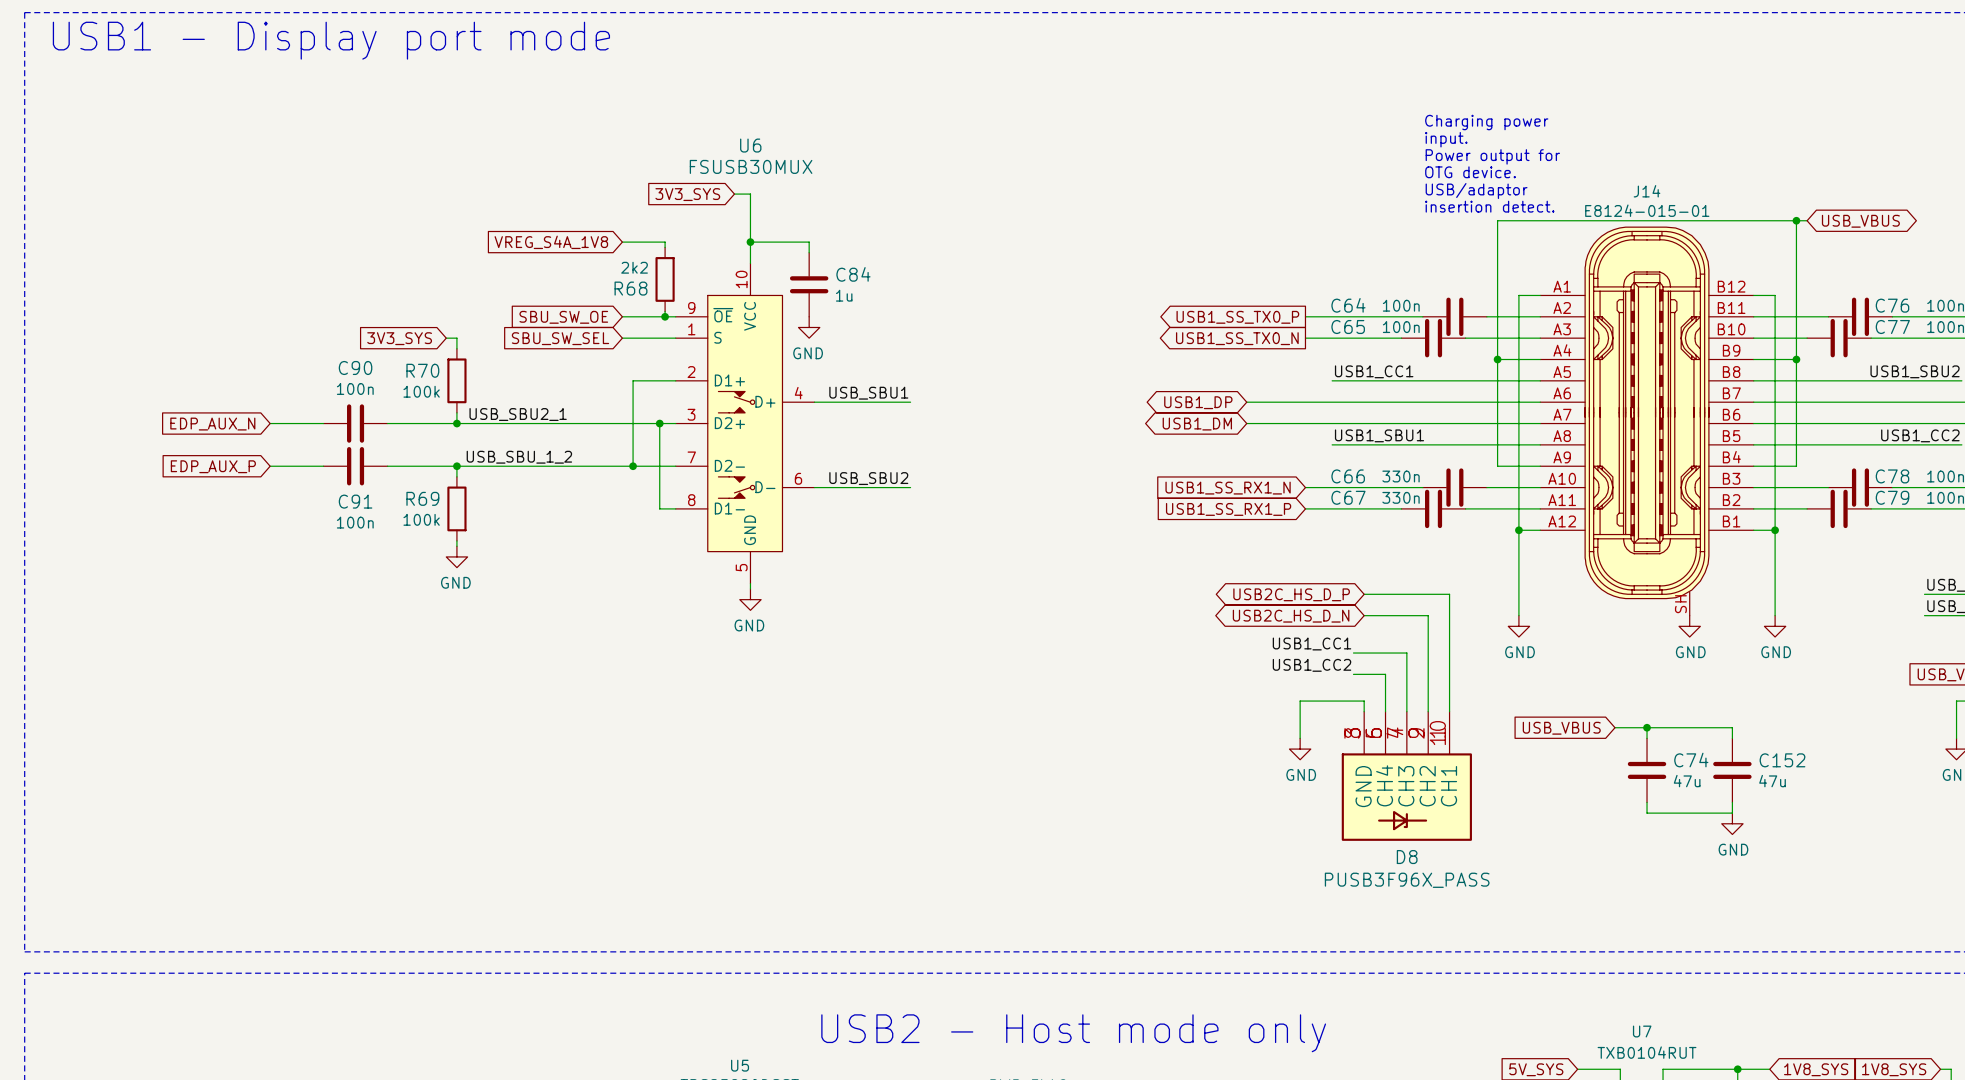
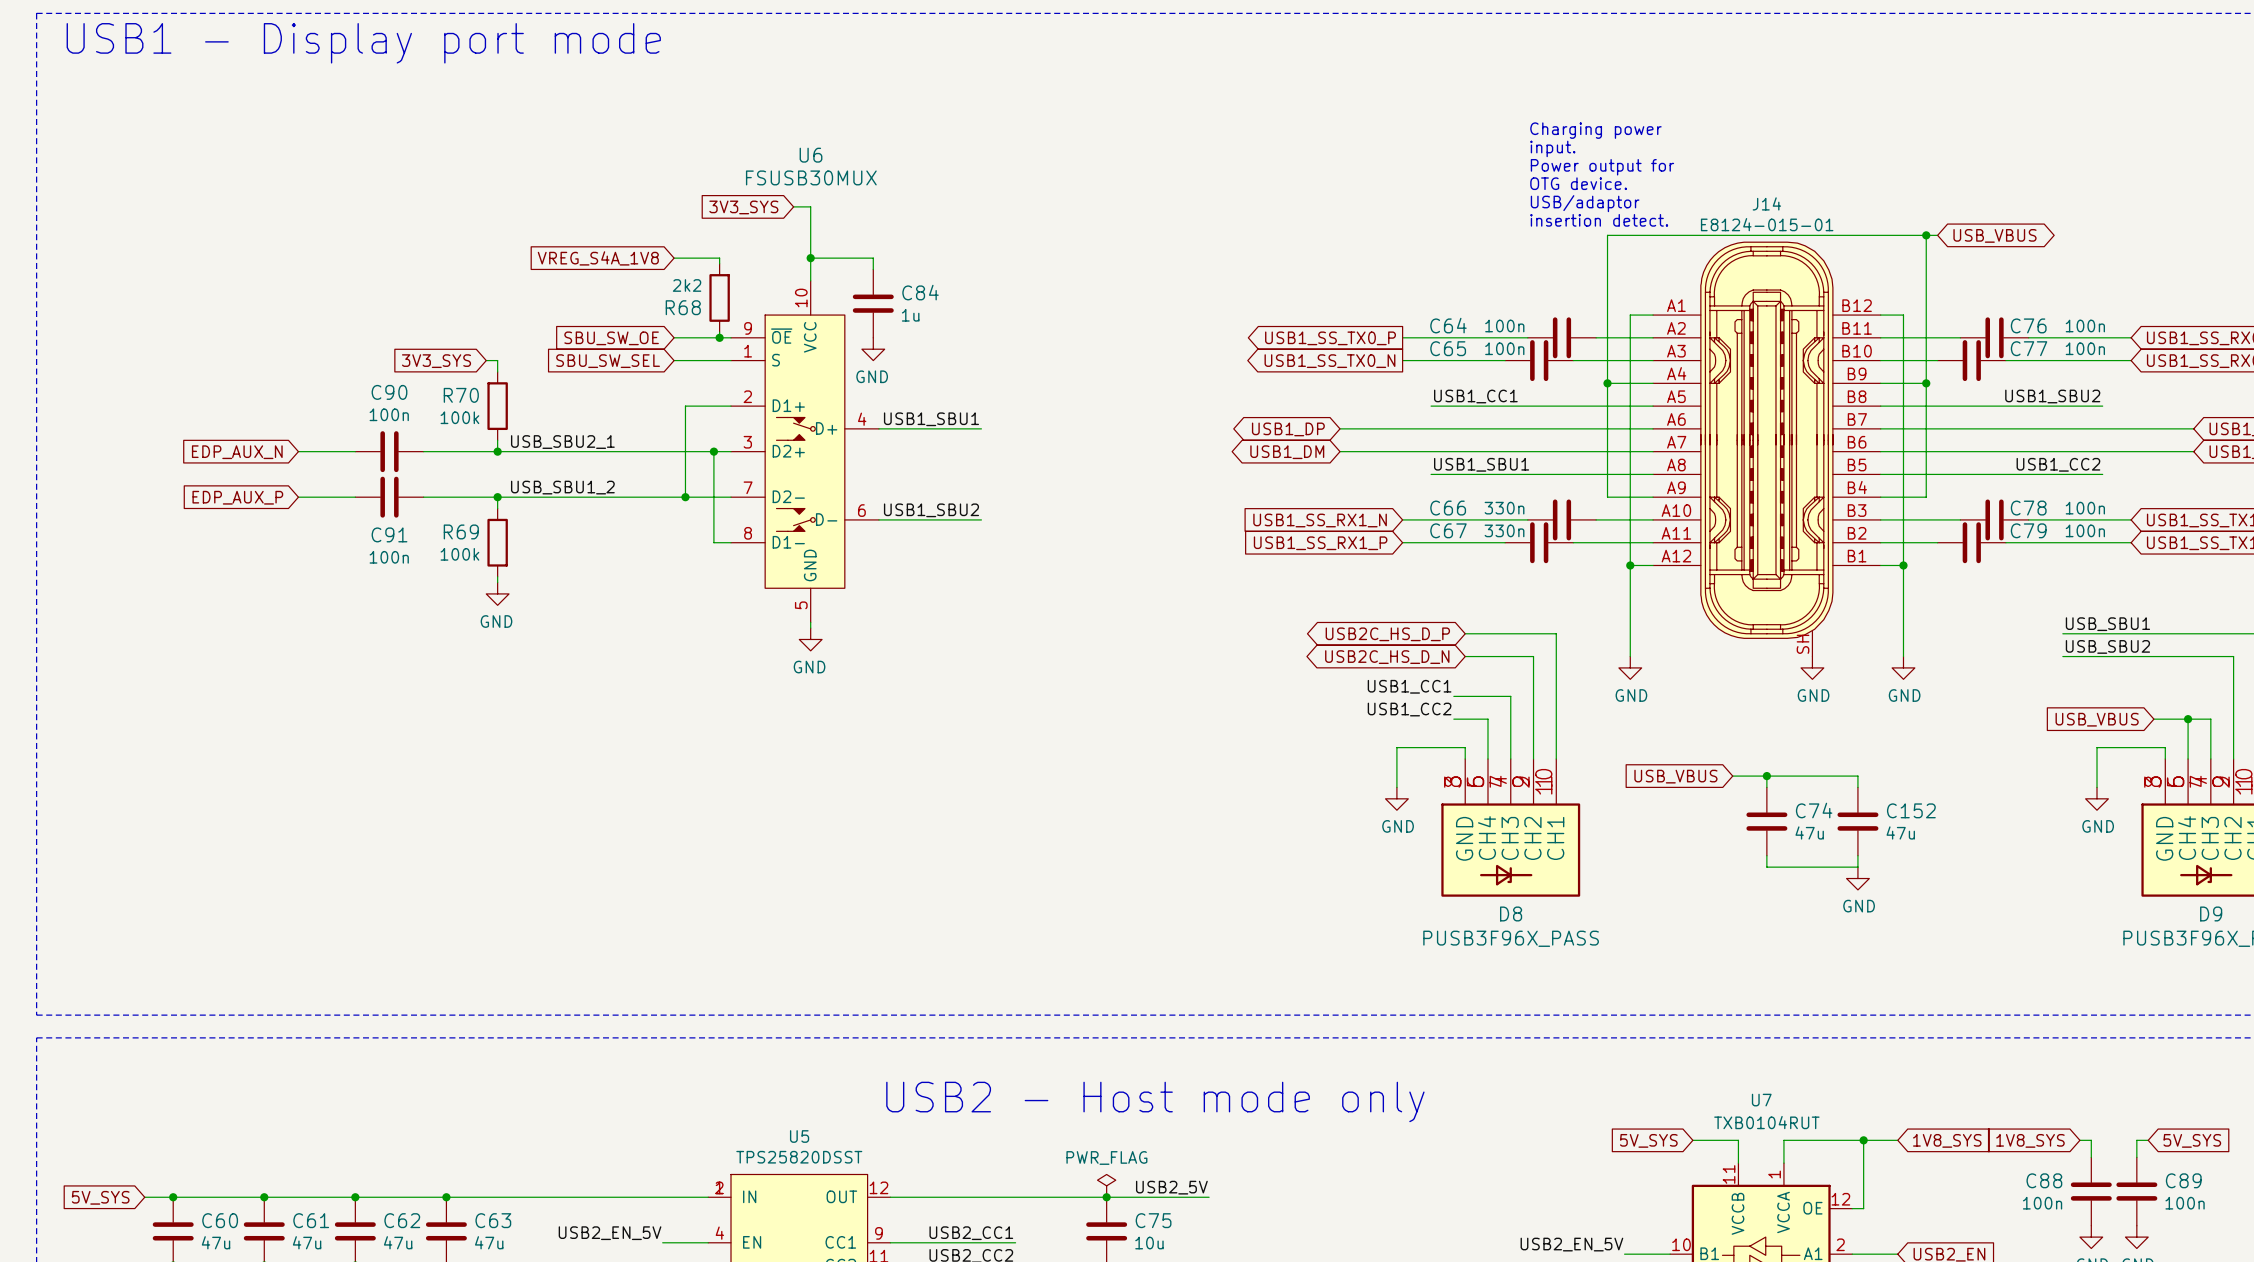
label: USB_SBU1 (868, 393) -> USB1_SBU1 (931, 419)
label: USB_SBU_1_2 (519, 457) -> USB_SBU1_2 (562, 487)
label: USB_SBU2 (868, 478) -> USB1_SBU2 (931, 510)

